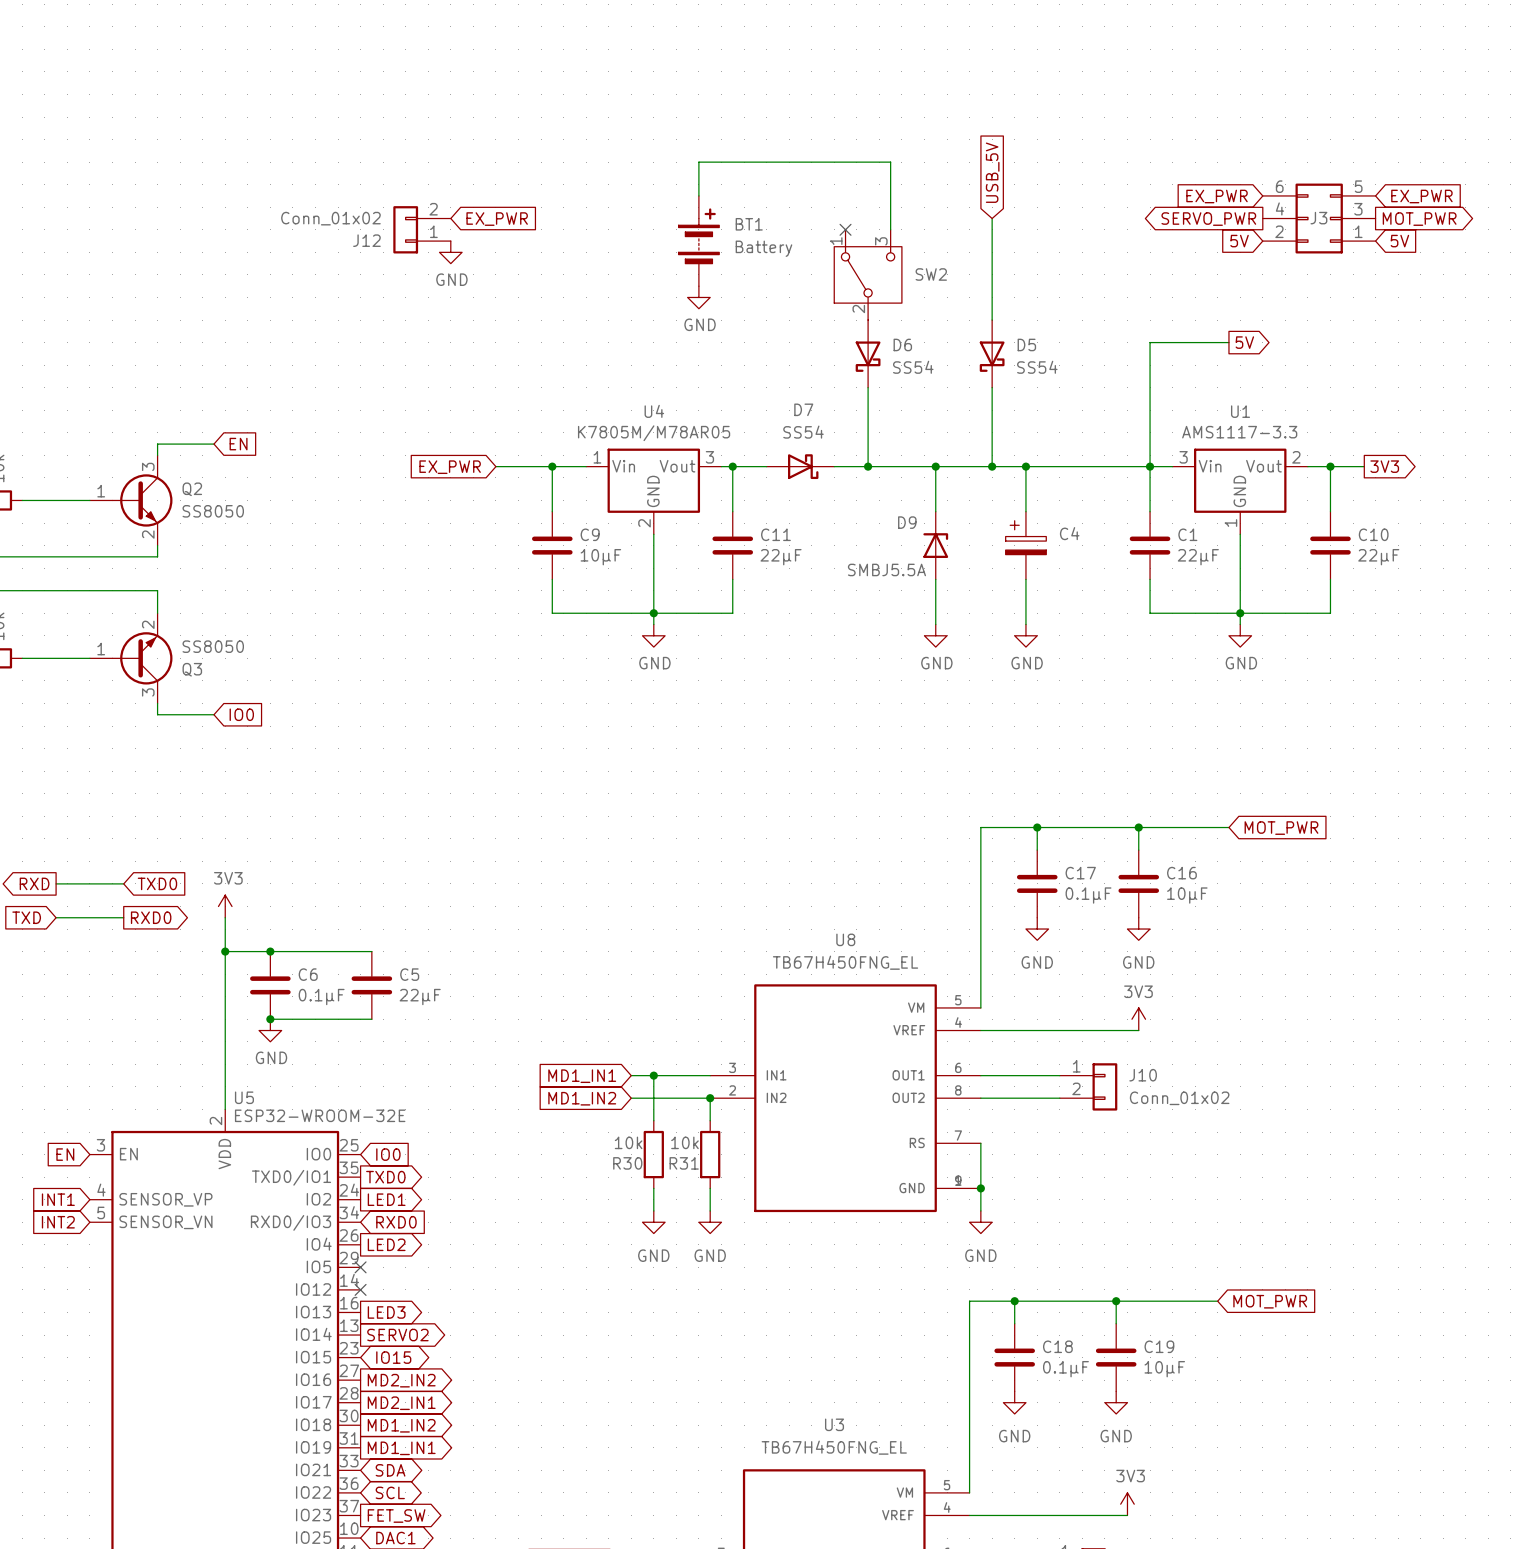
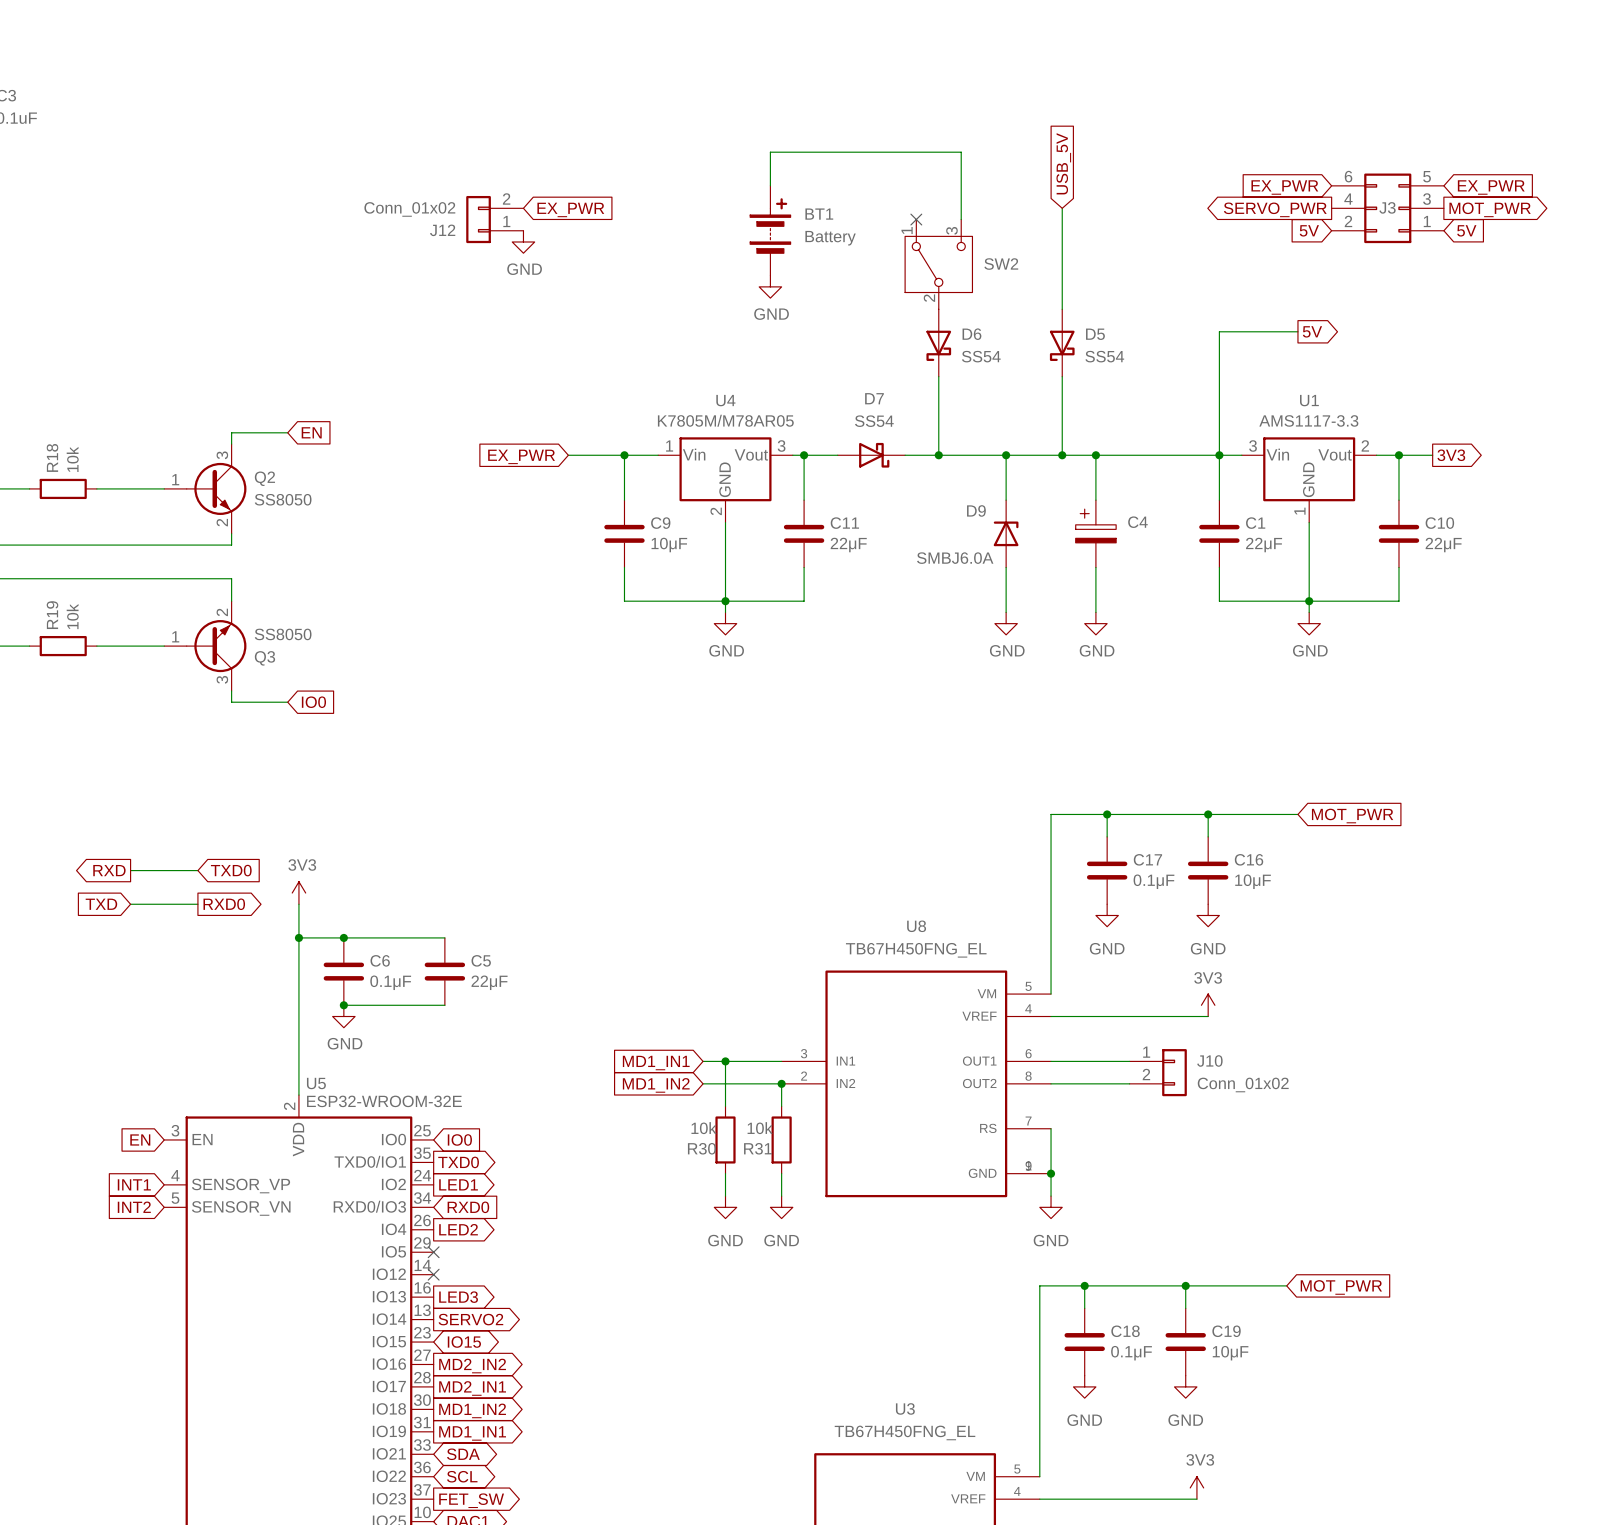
D9 value: SMBJ5.5A (886, 569) -> SMBJ6.0A (955, 558)

